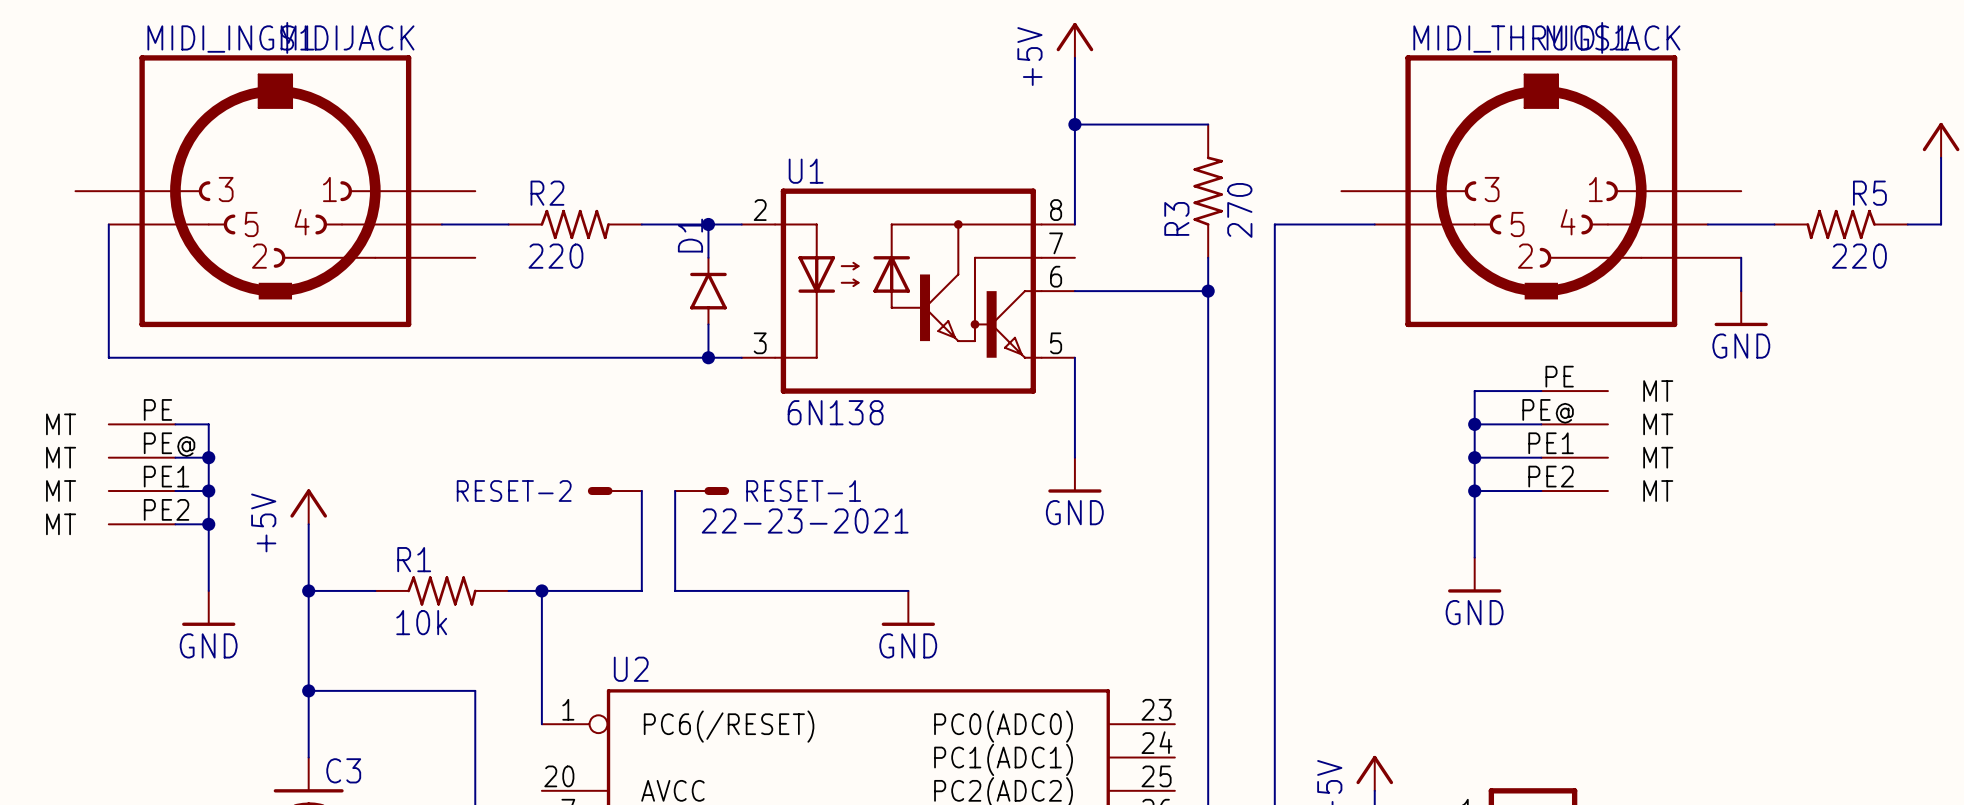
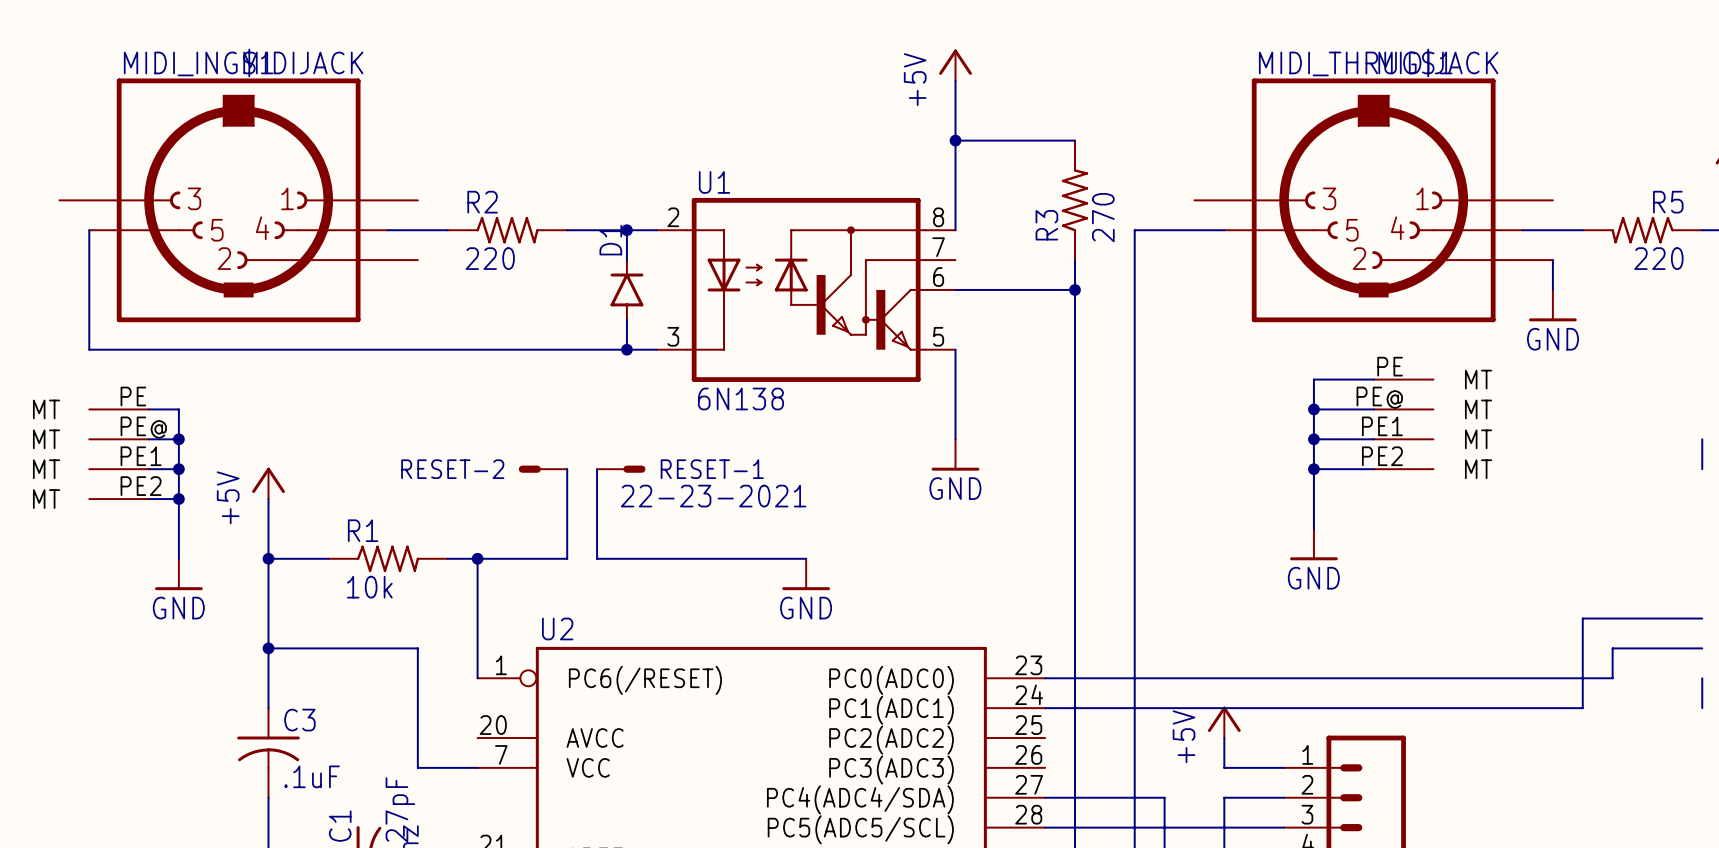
wire: none -> (1702, 439) (1702, 469)
wire: none -> (1702, 618) (1582, 618) (1582, 708) (1045, 708)
wire: none -> (1702, 648) (1612, 648) (1612, 678) (1045, 678)
wire: none -> (1702, 678) (1702, 708)

